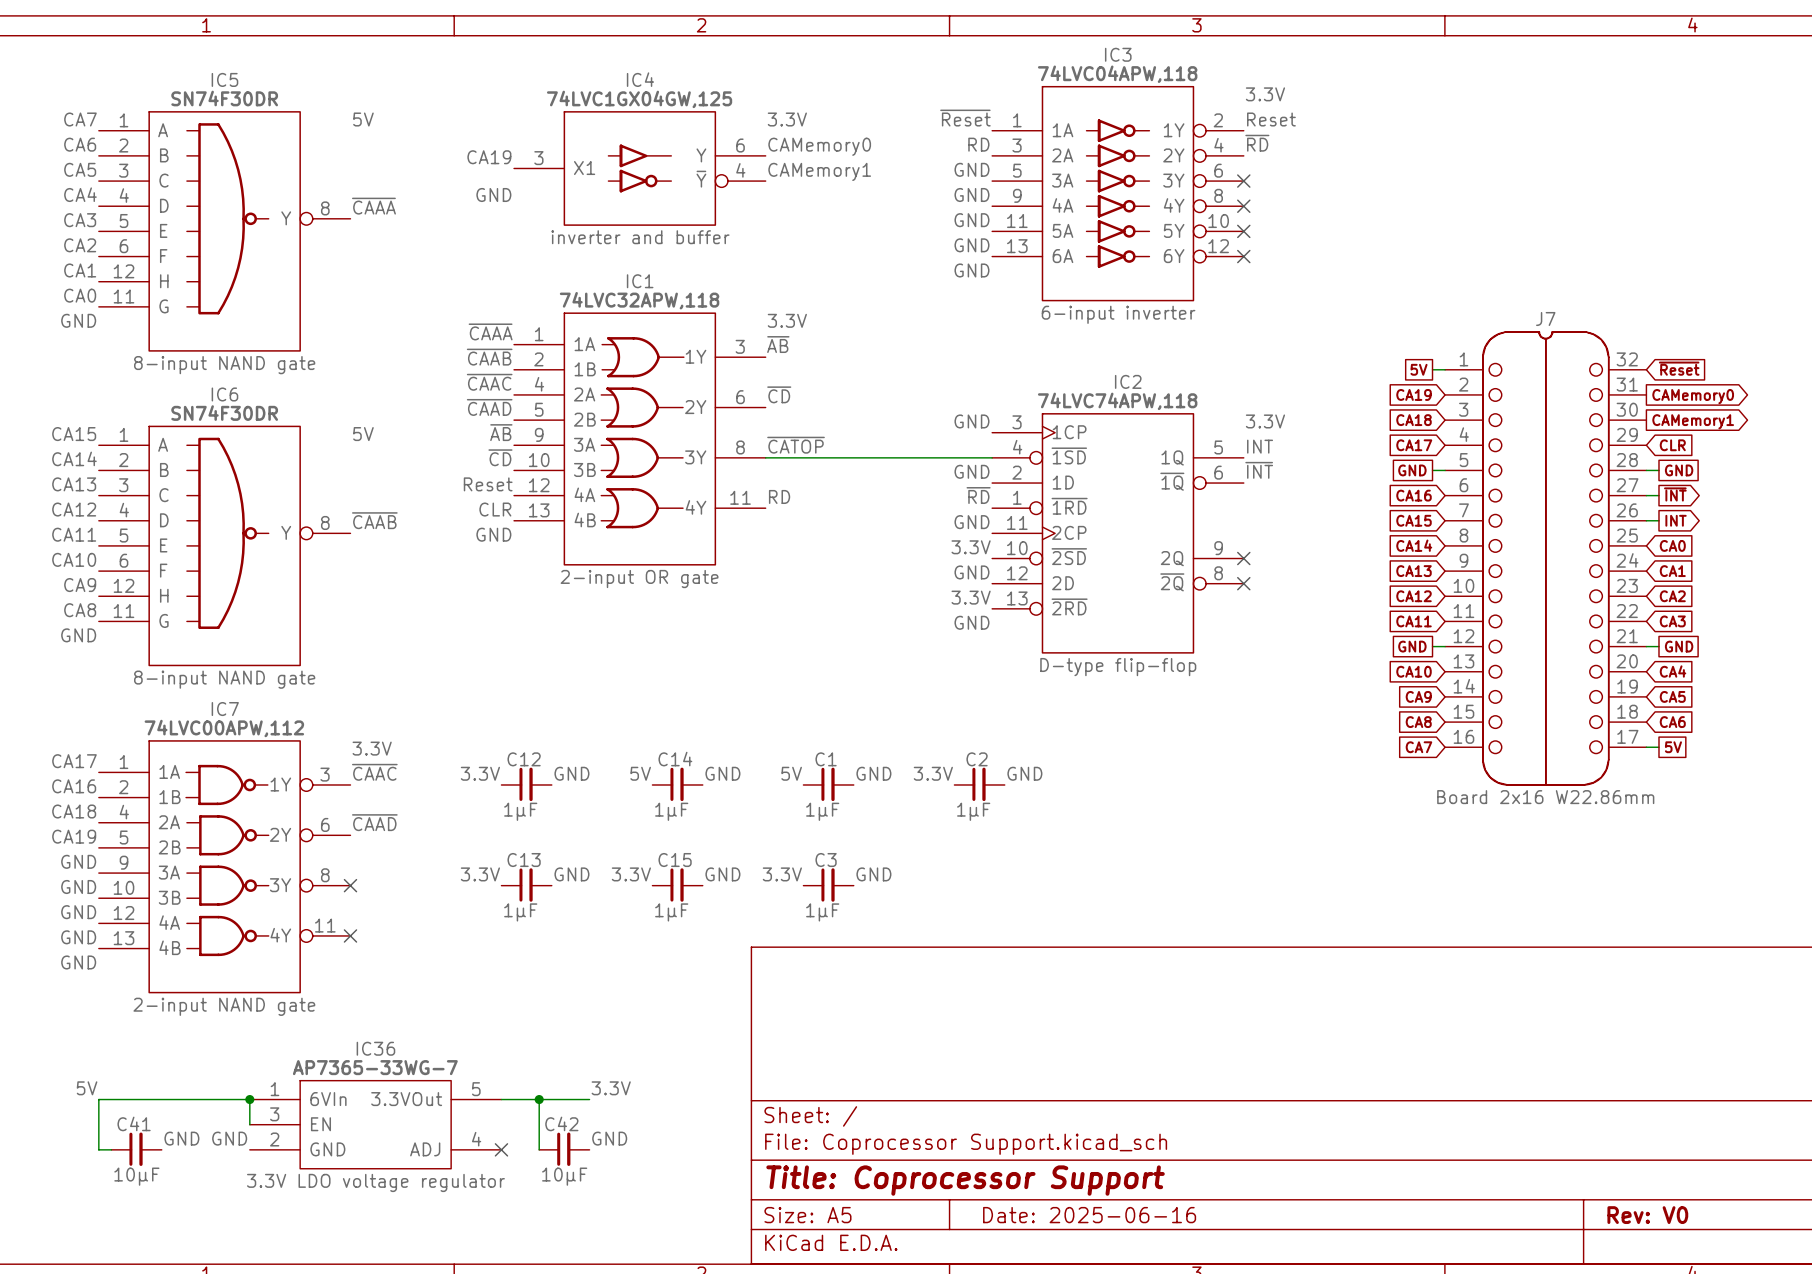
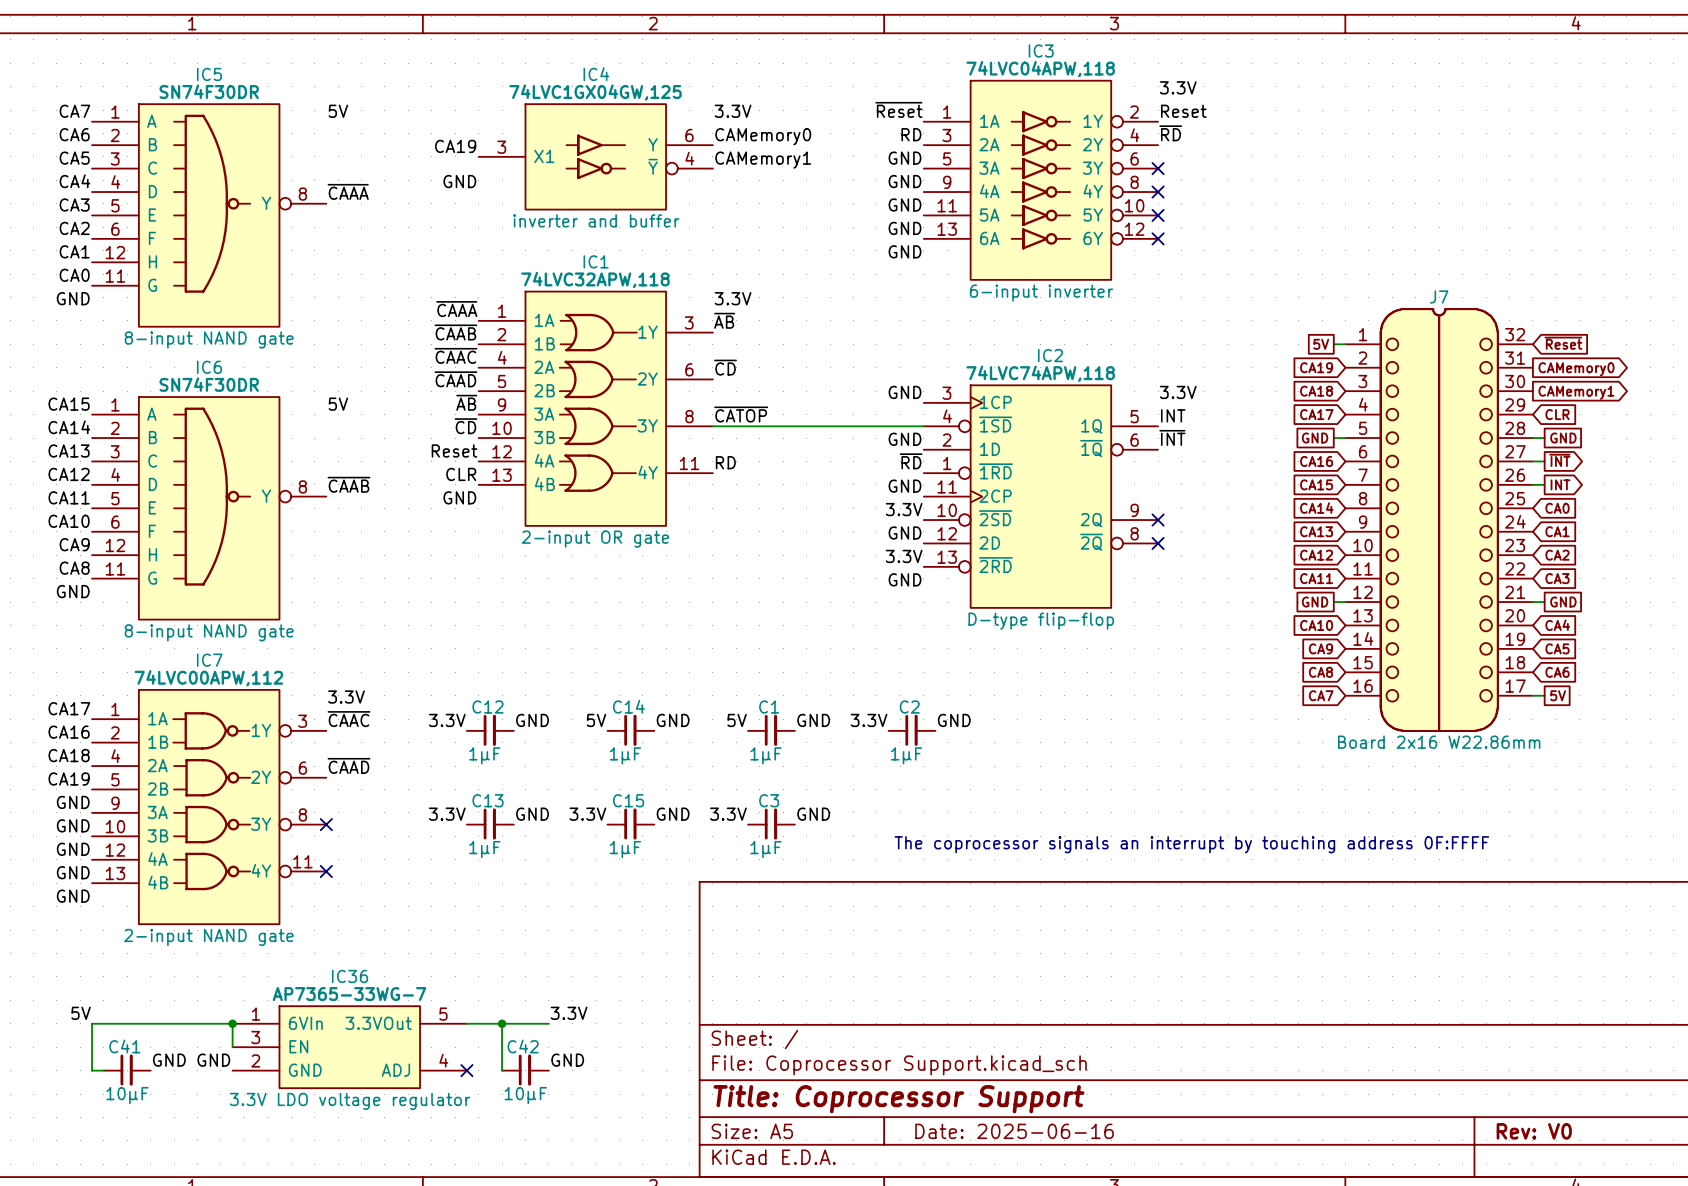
text: none -> The coprocessor signals an interrupt by touching address 0F:FFFF (1191, 844)

